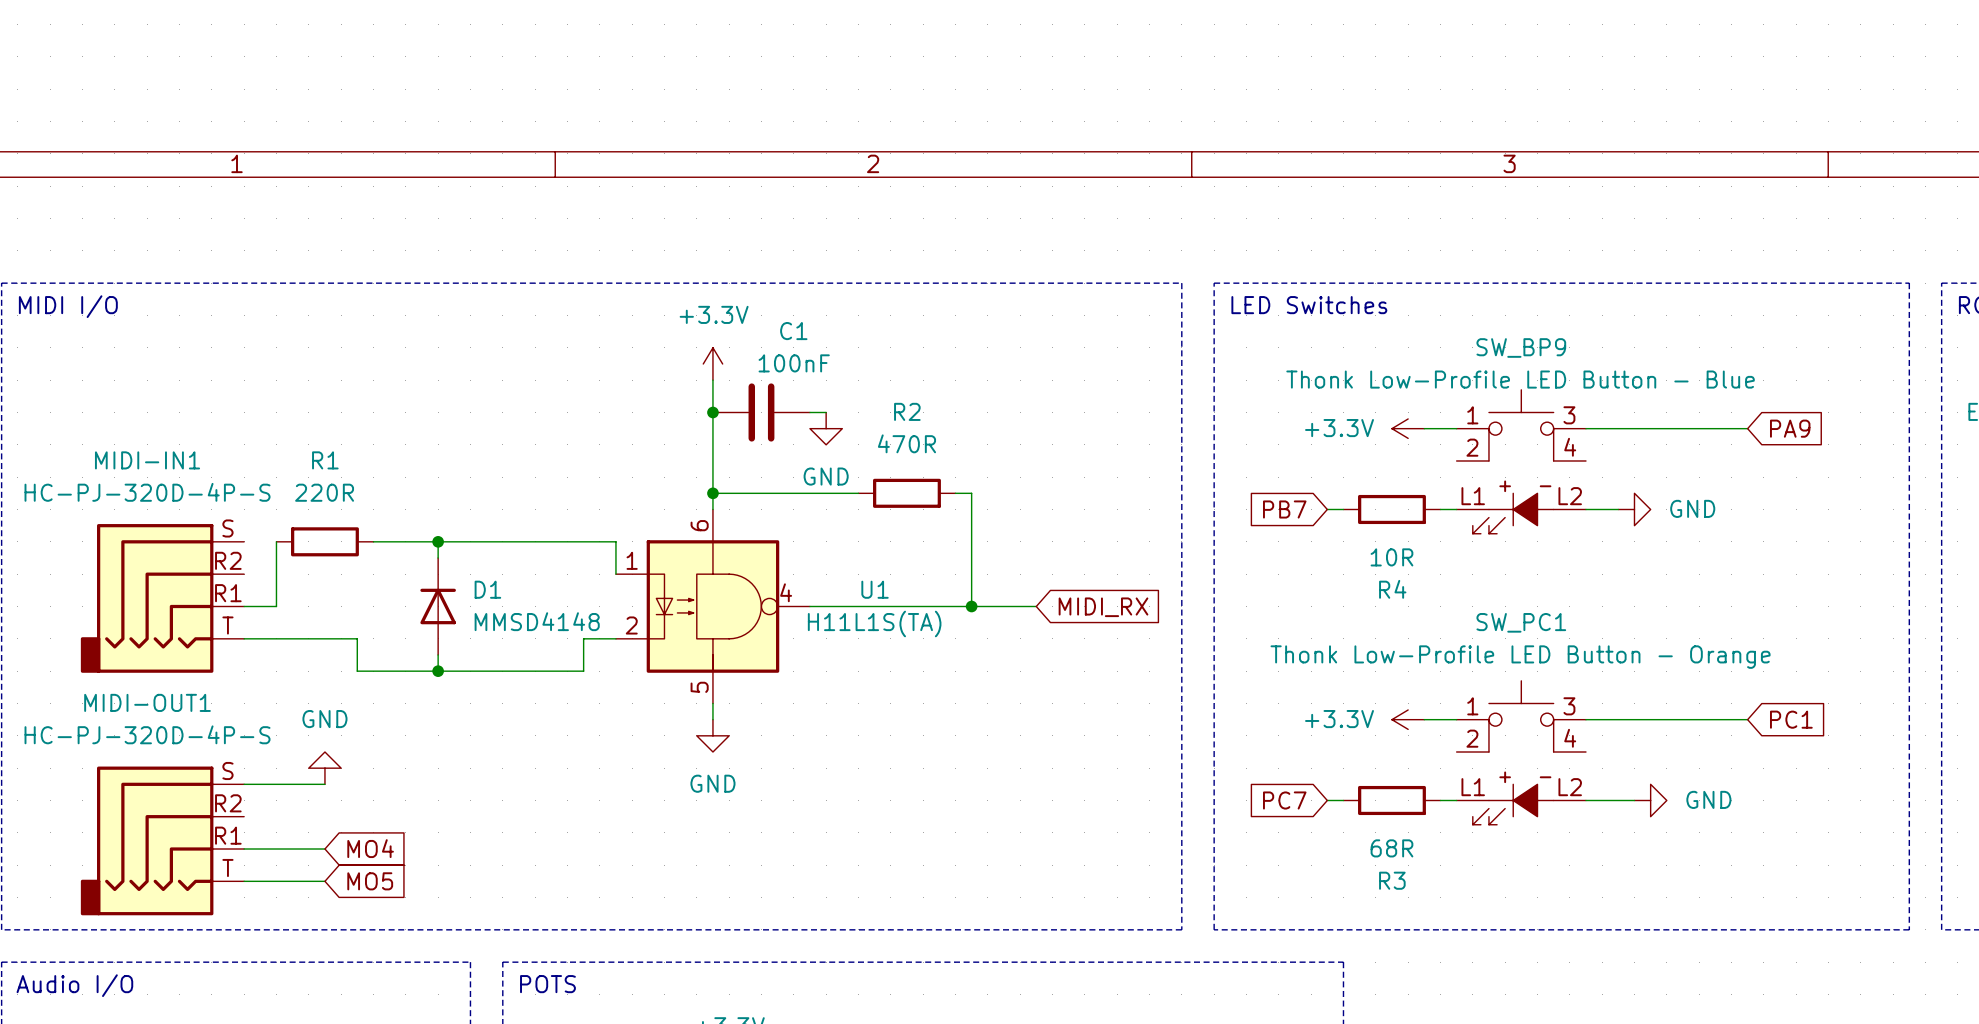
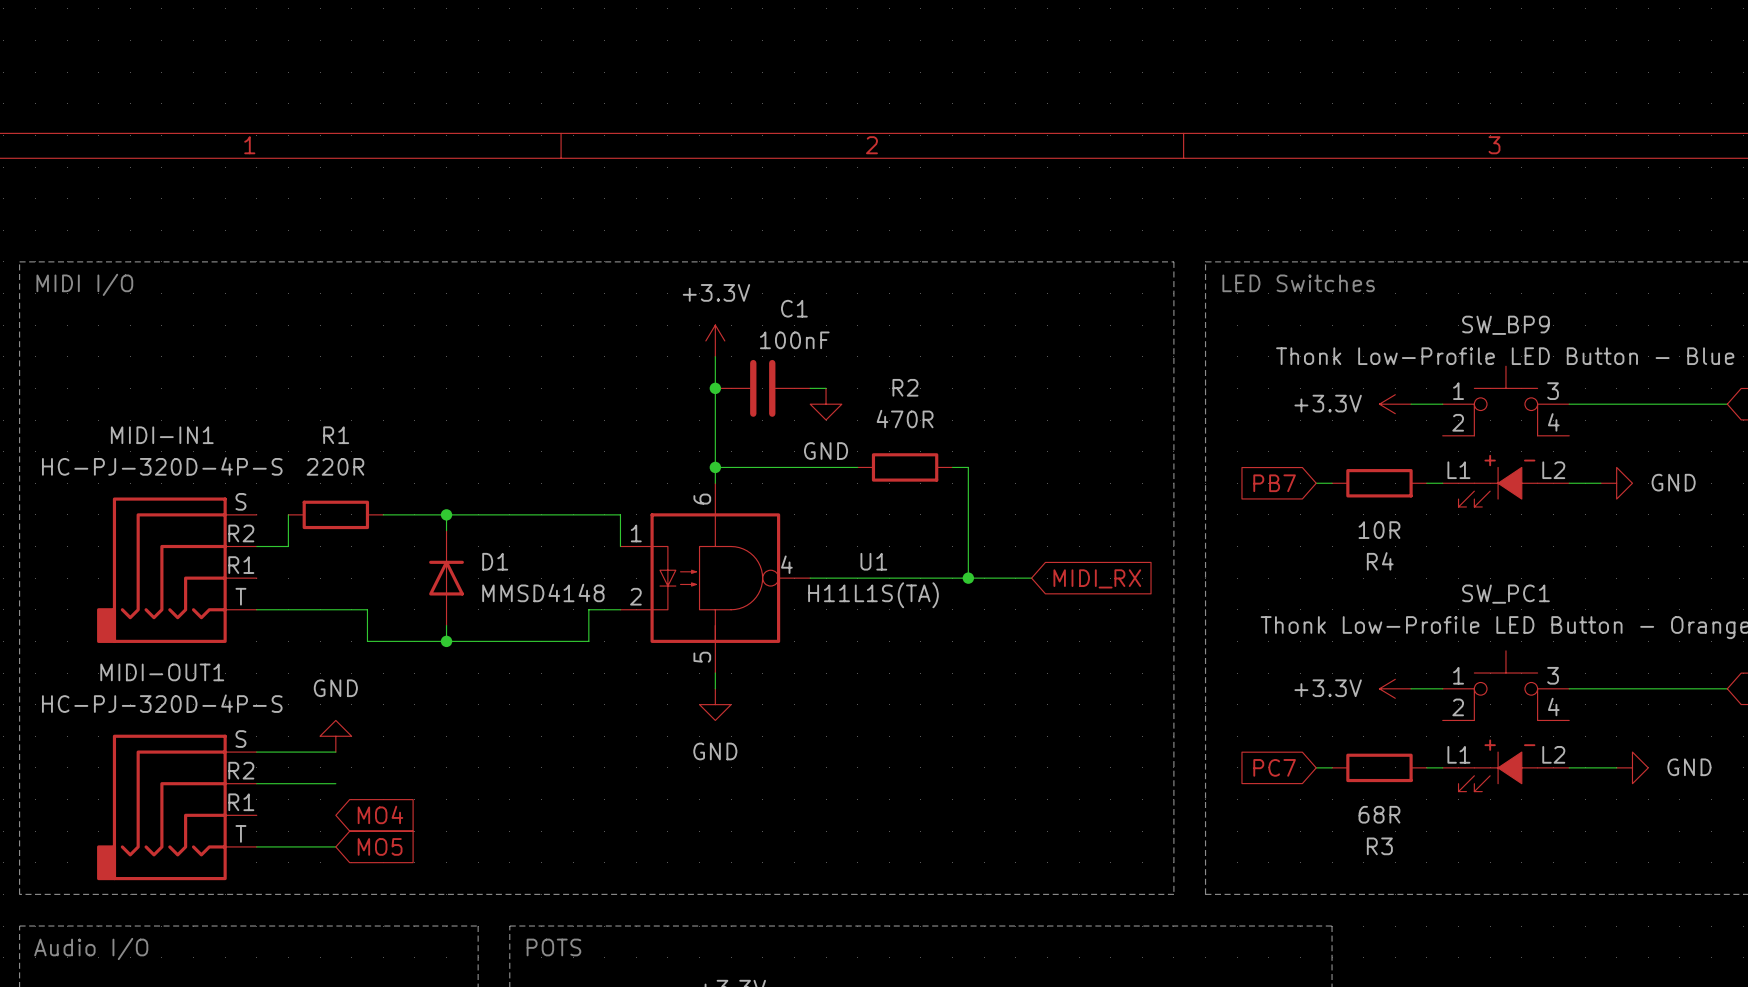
wire: (276, 574) (276, 606) (244, 606) -> (288, 546) (256, 546)
wire: (244, 849) (324, 849) -> (256, 783) (335, 783)

